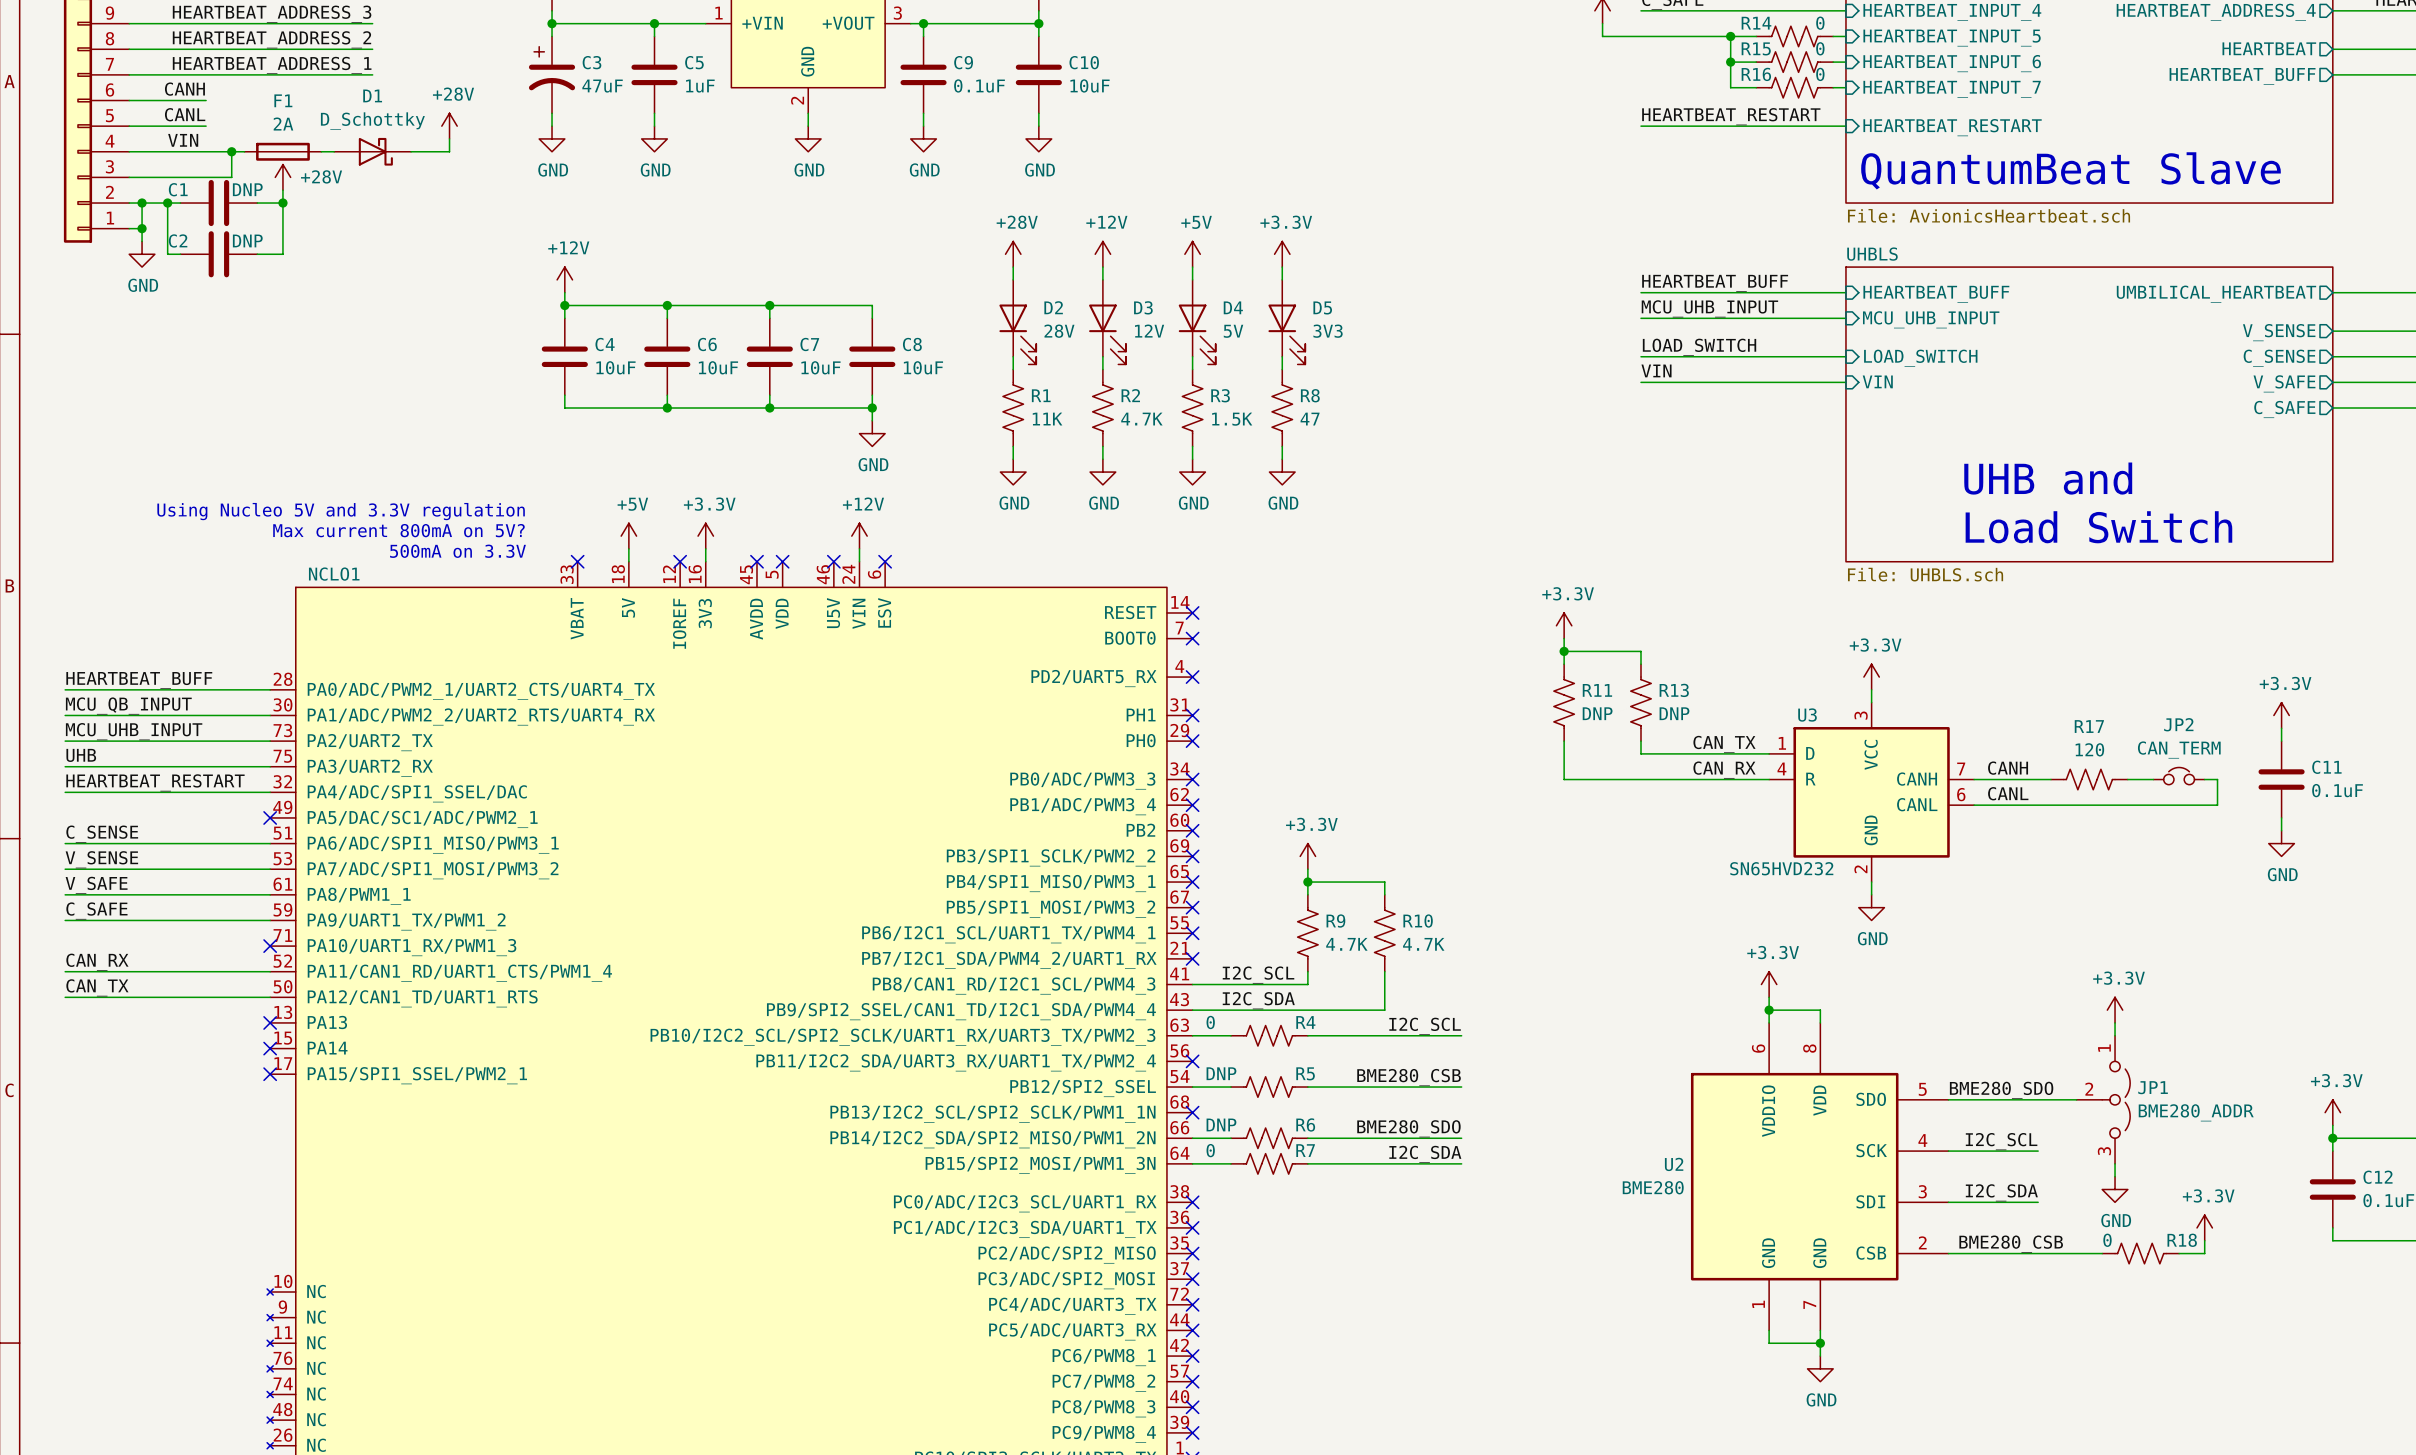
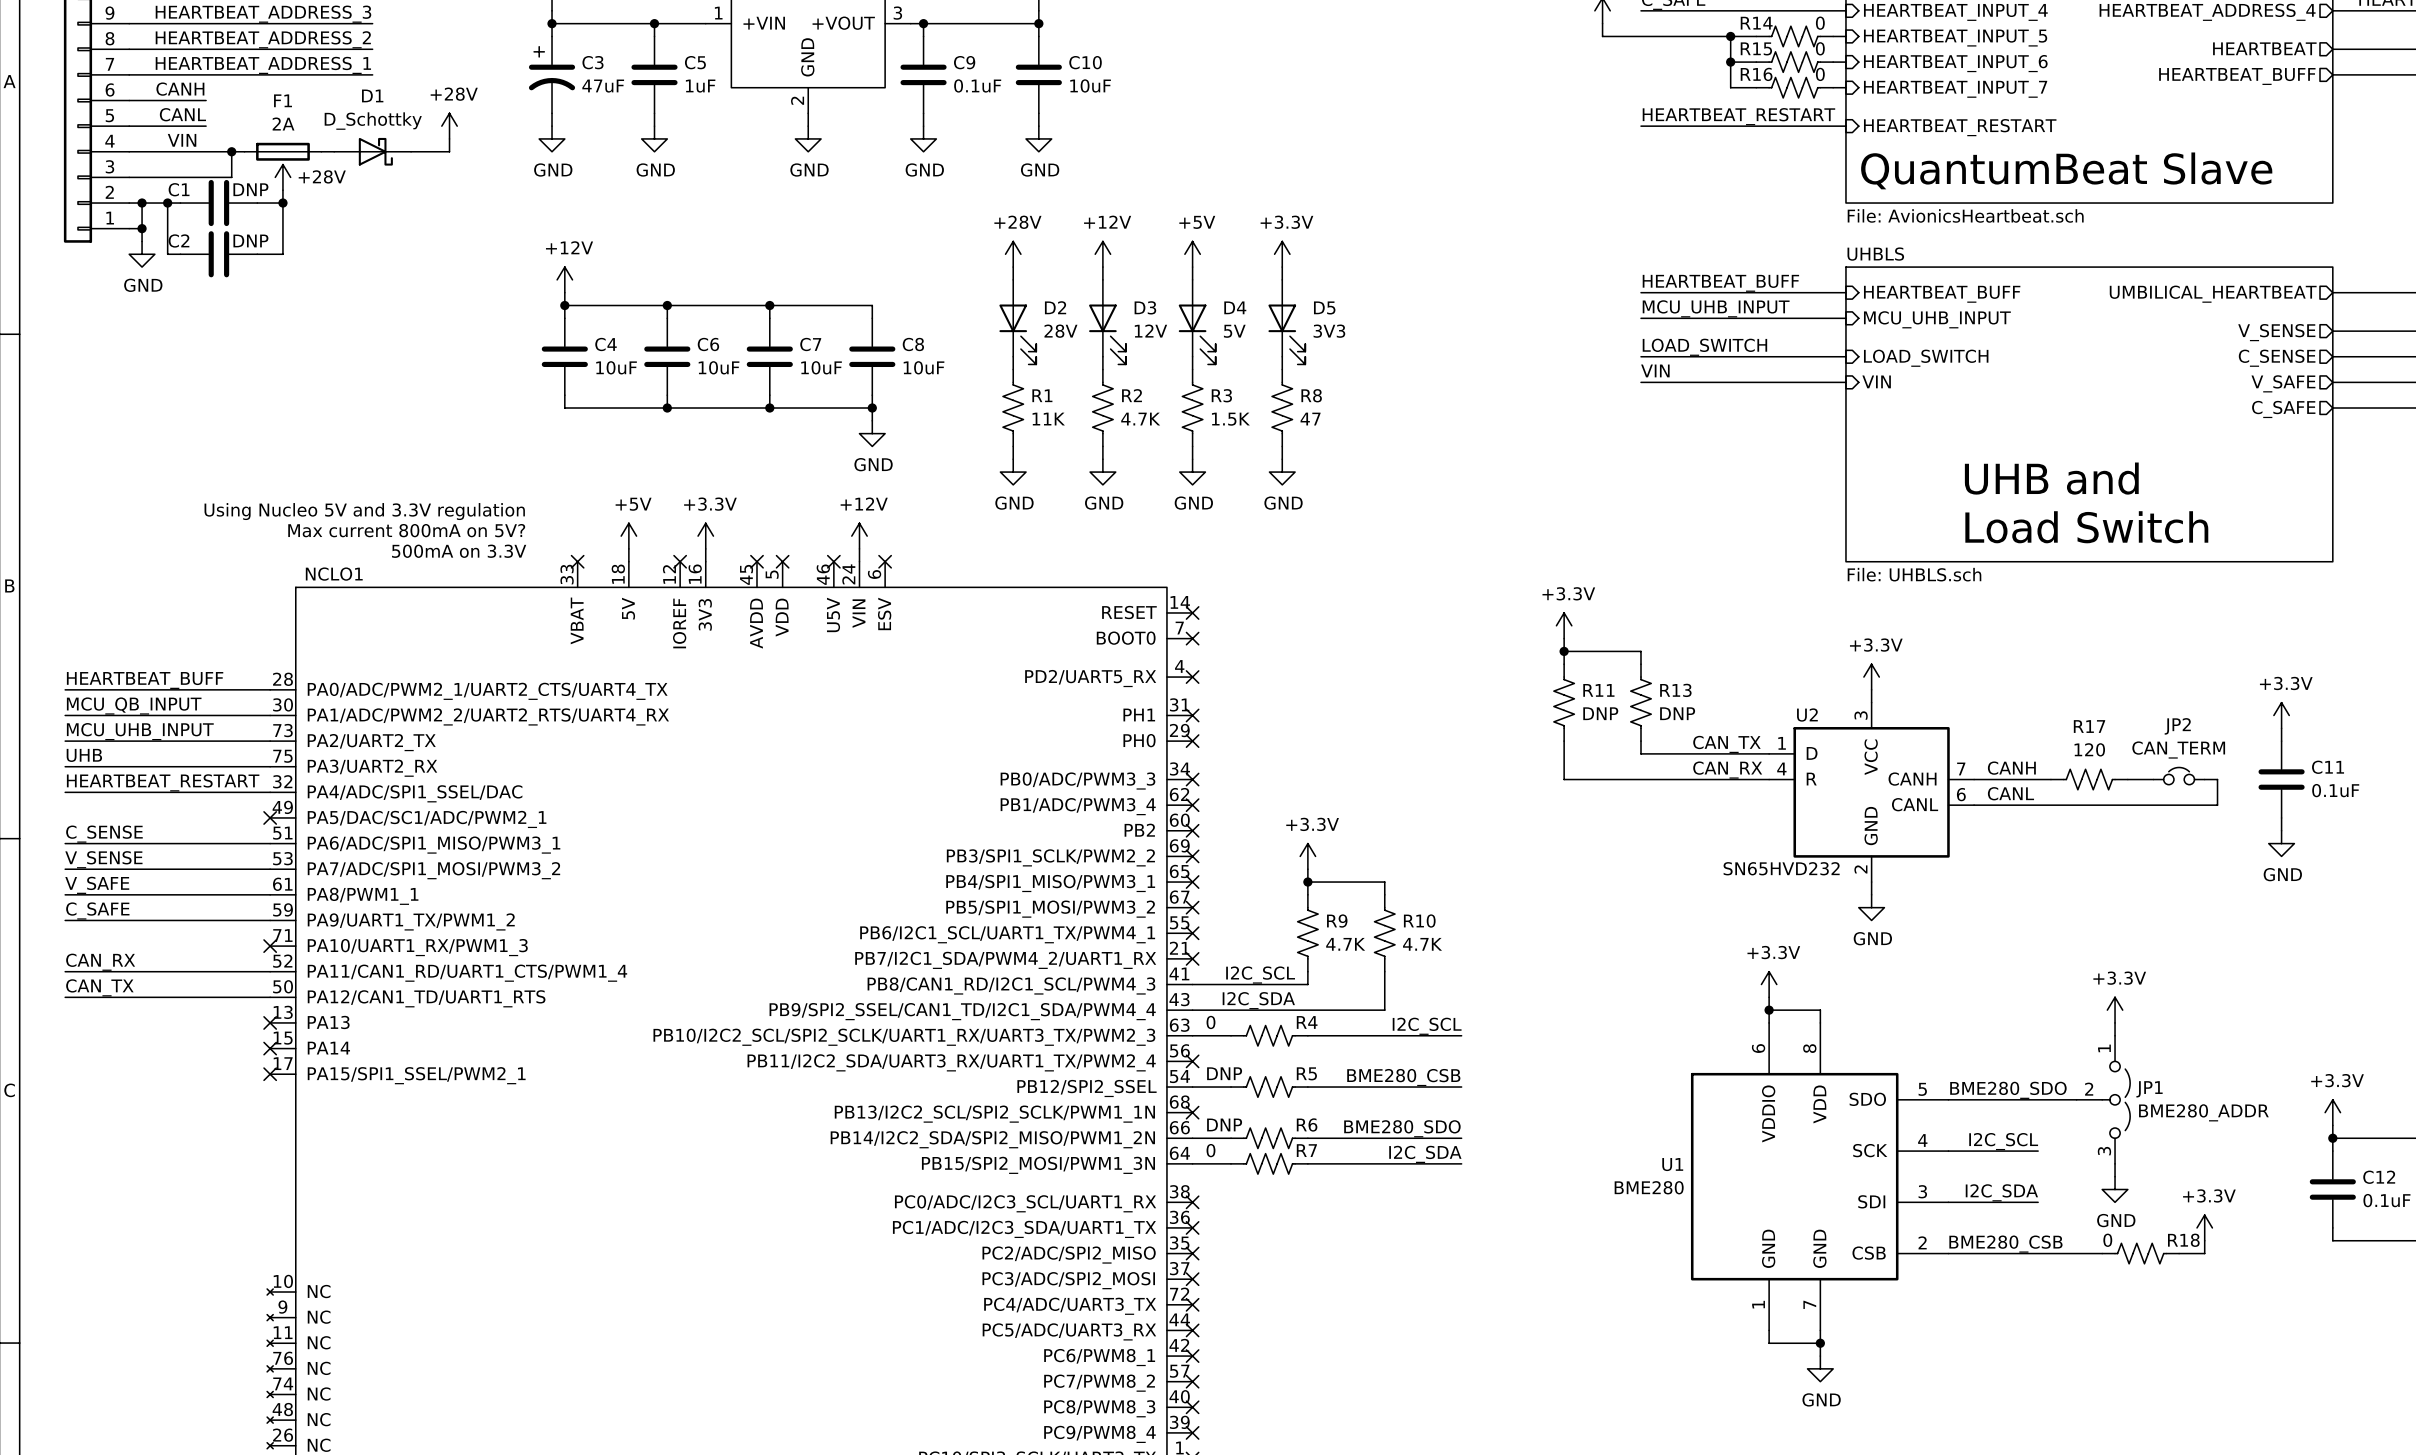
U3 name: U3 (1807, 715) -> U2 (1807, 715)
U2 name: U2 (1674, 1164) -> U1 (1672, 1164)

